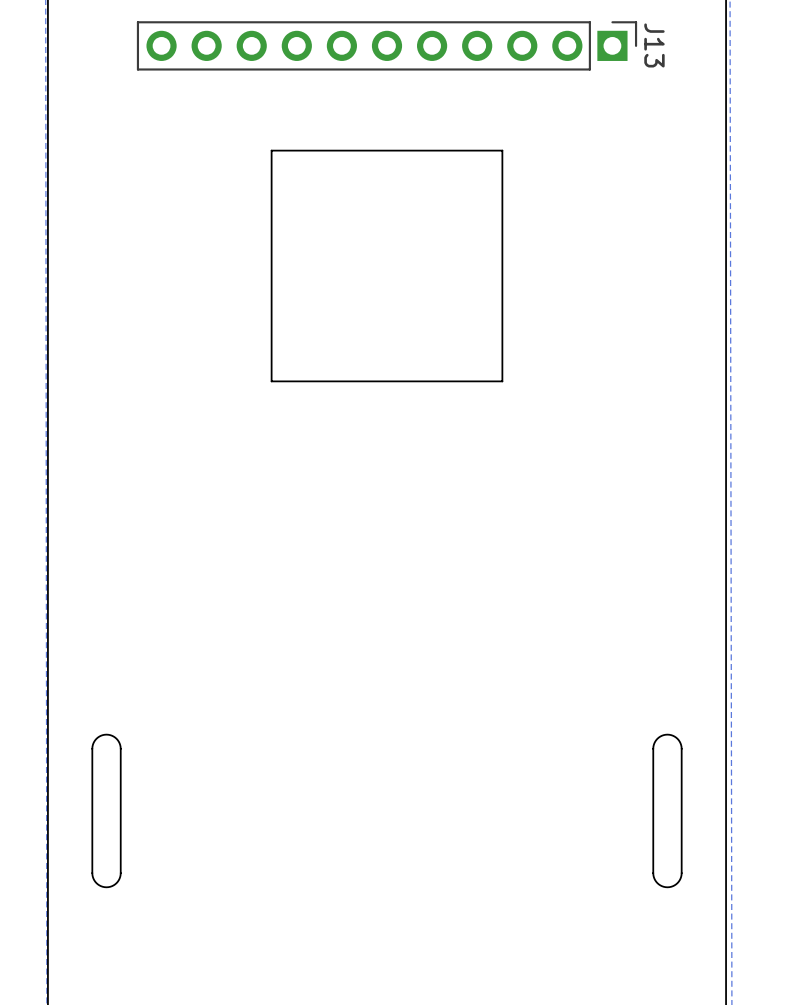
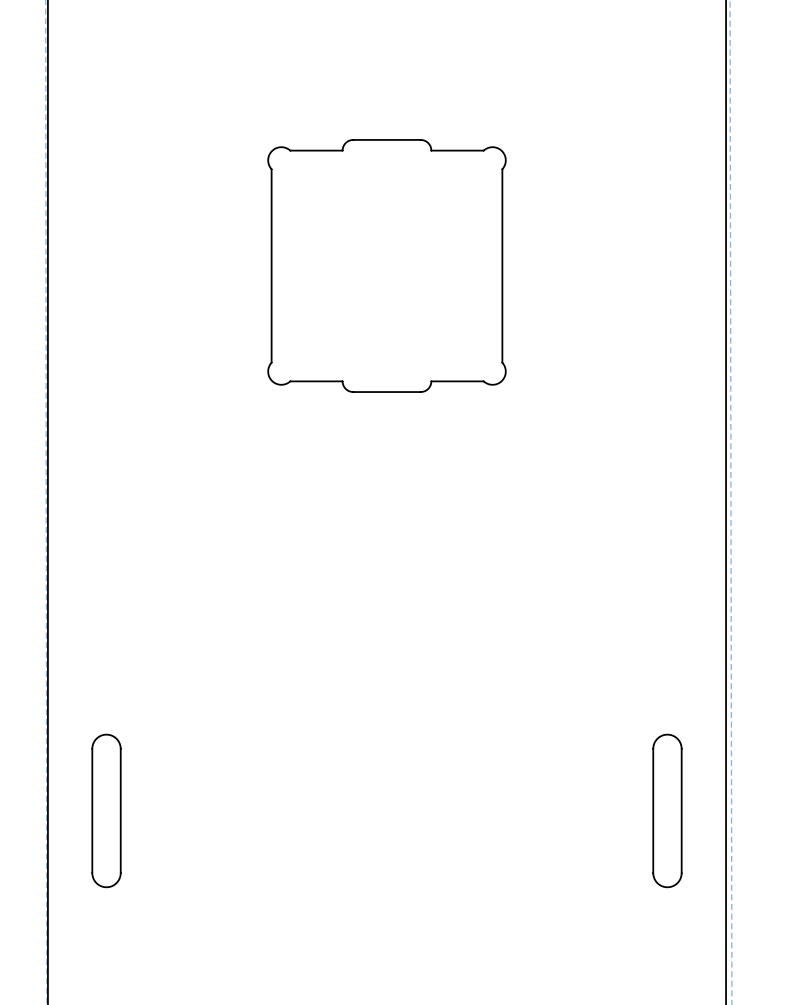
J13: (386, 45) -> none
drawing shape: [270, 149, 504, 383] -> [267, 139, 507, 393]

